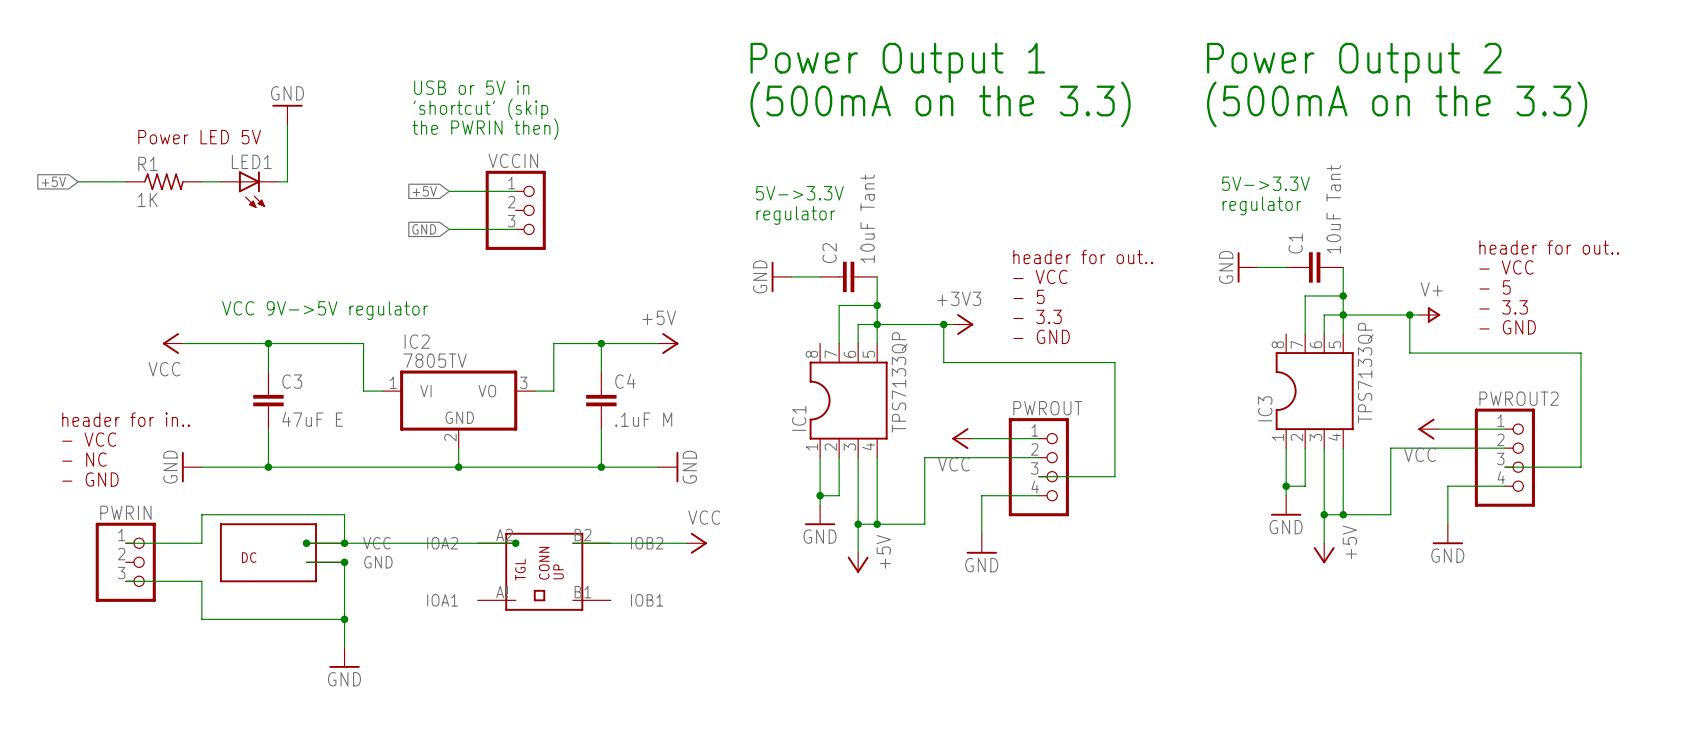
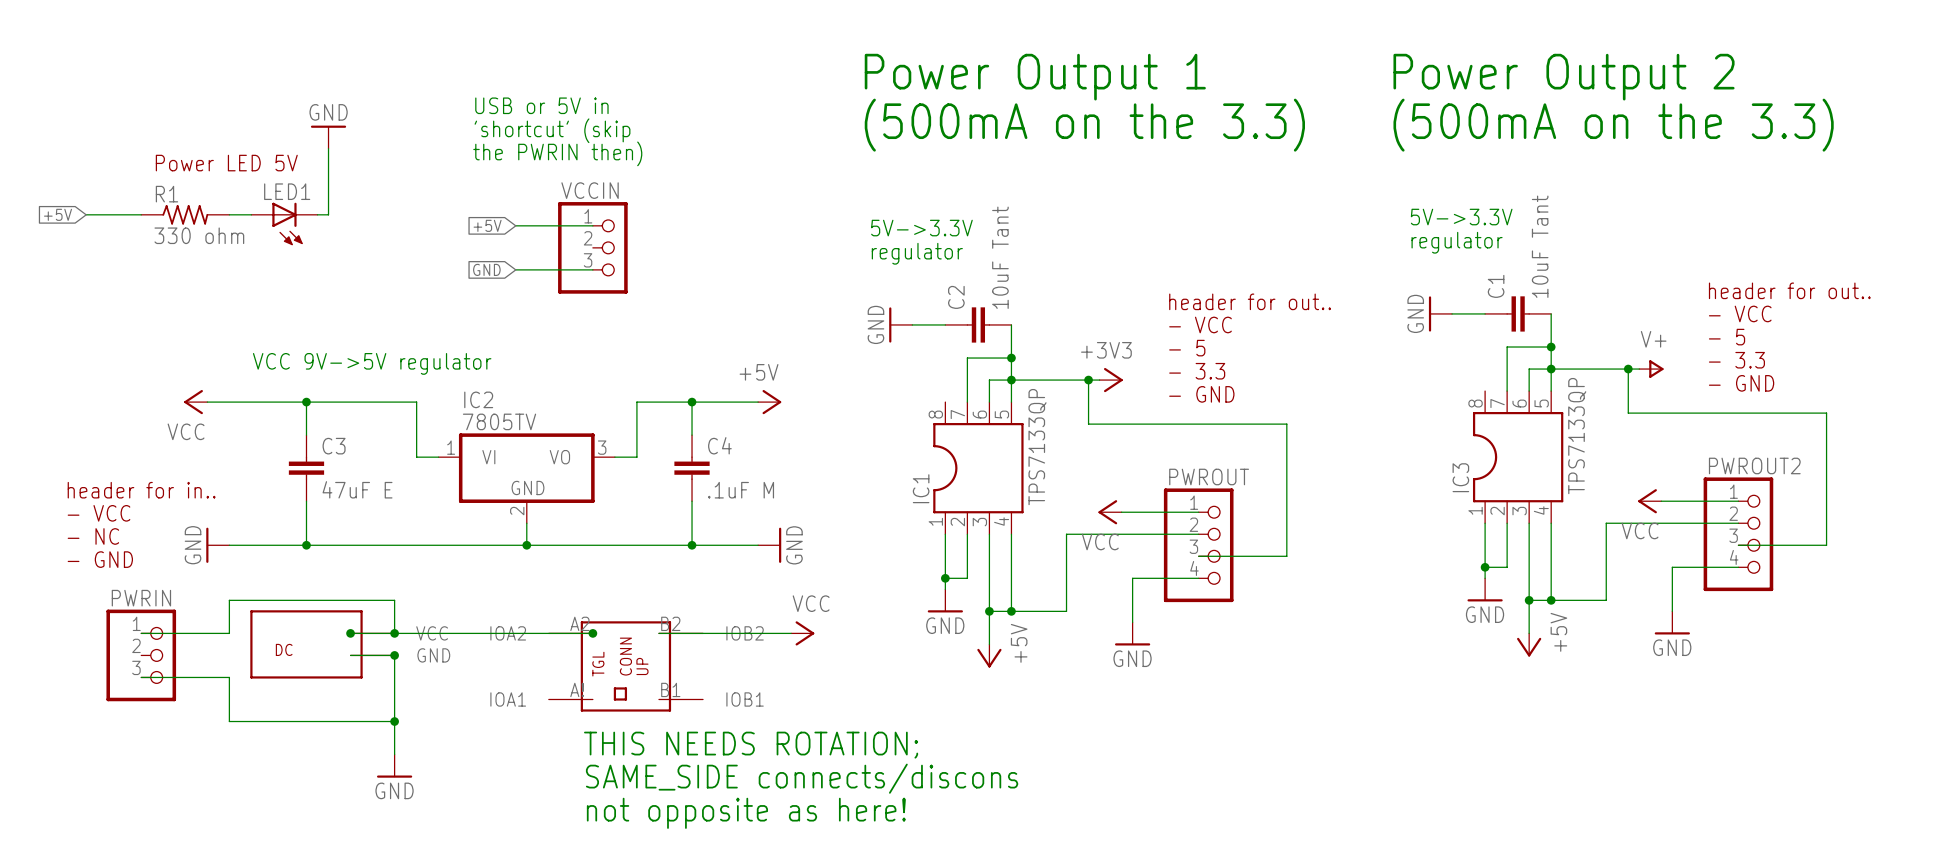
R1 value: 1K (147, 199) -> 330 ohm (199, 235)
text: none -> THIS NEEDS ROTATION; (751, 745)
text: none -> SAME_SIDE connects/discons (802, 778)
text: none -> not opposite as here! (746, 813)

